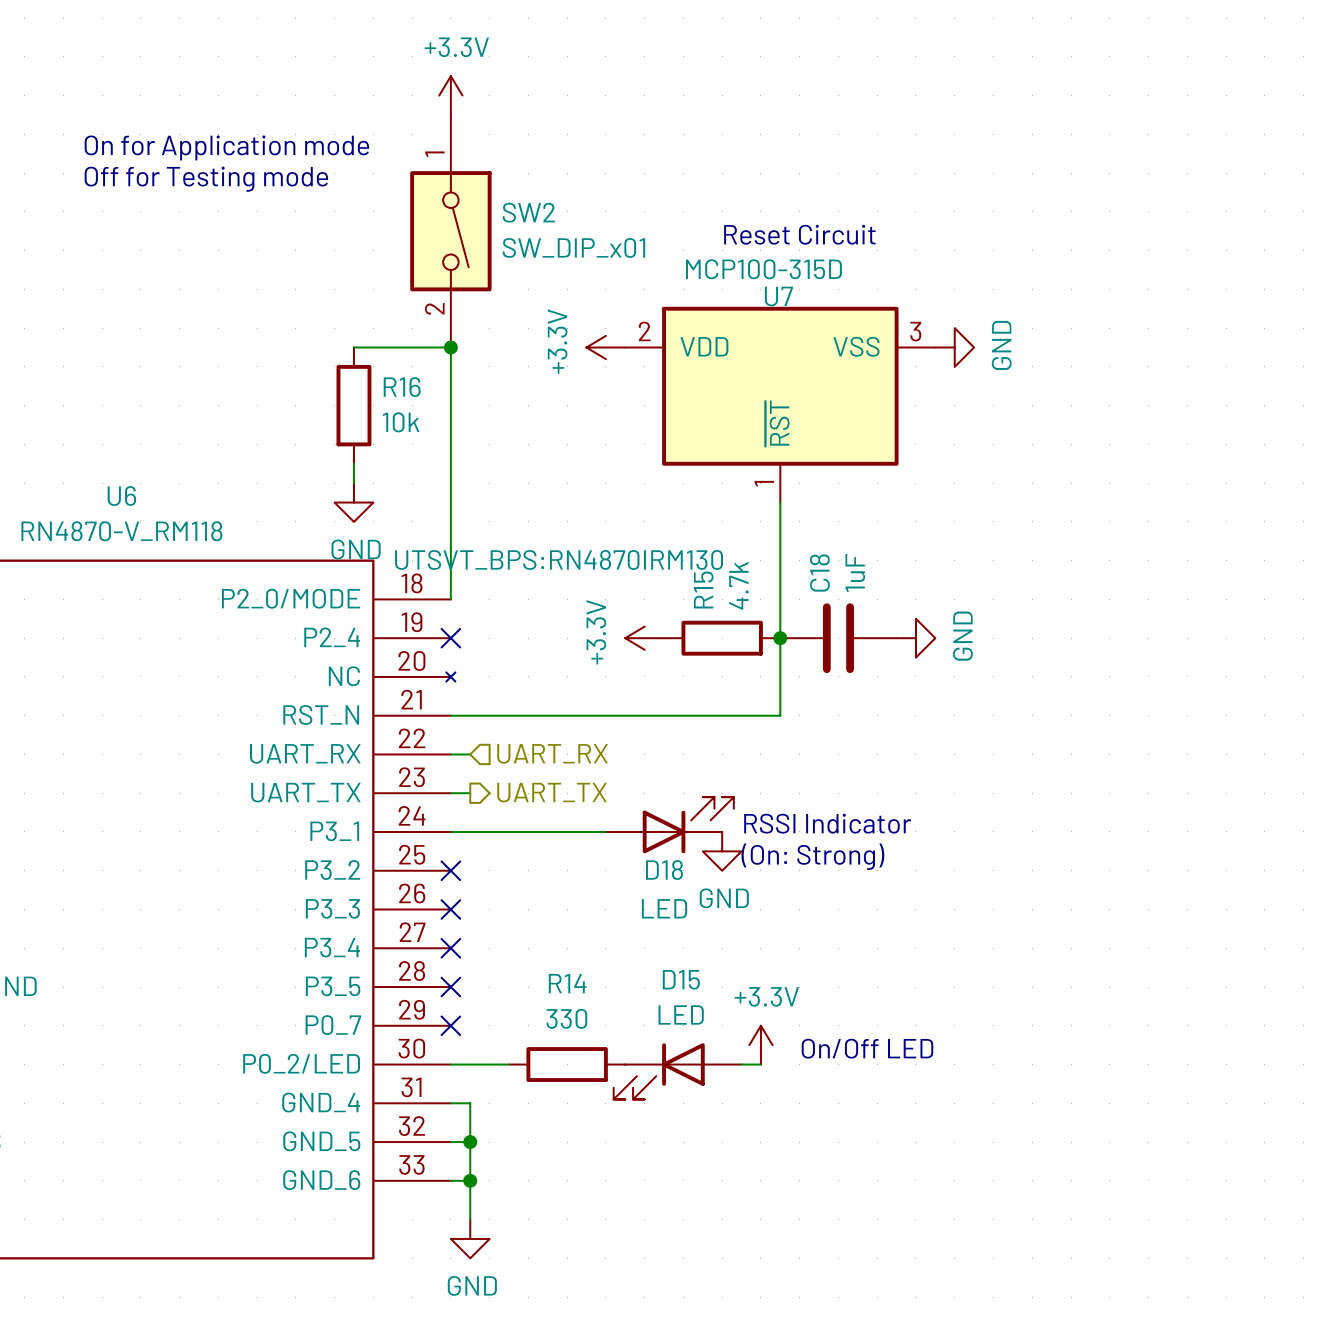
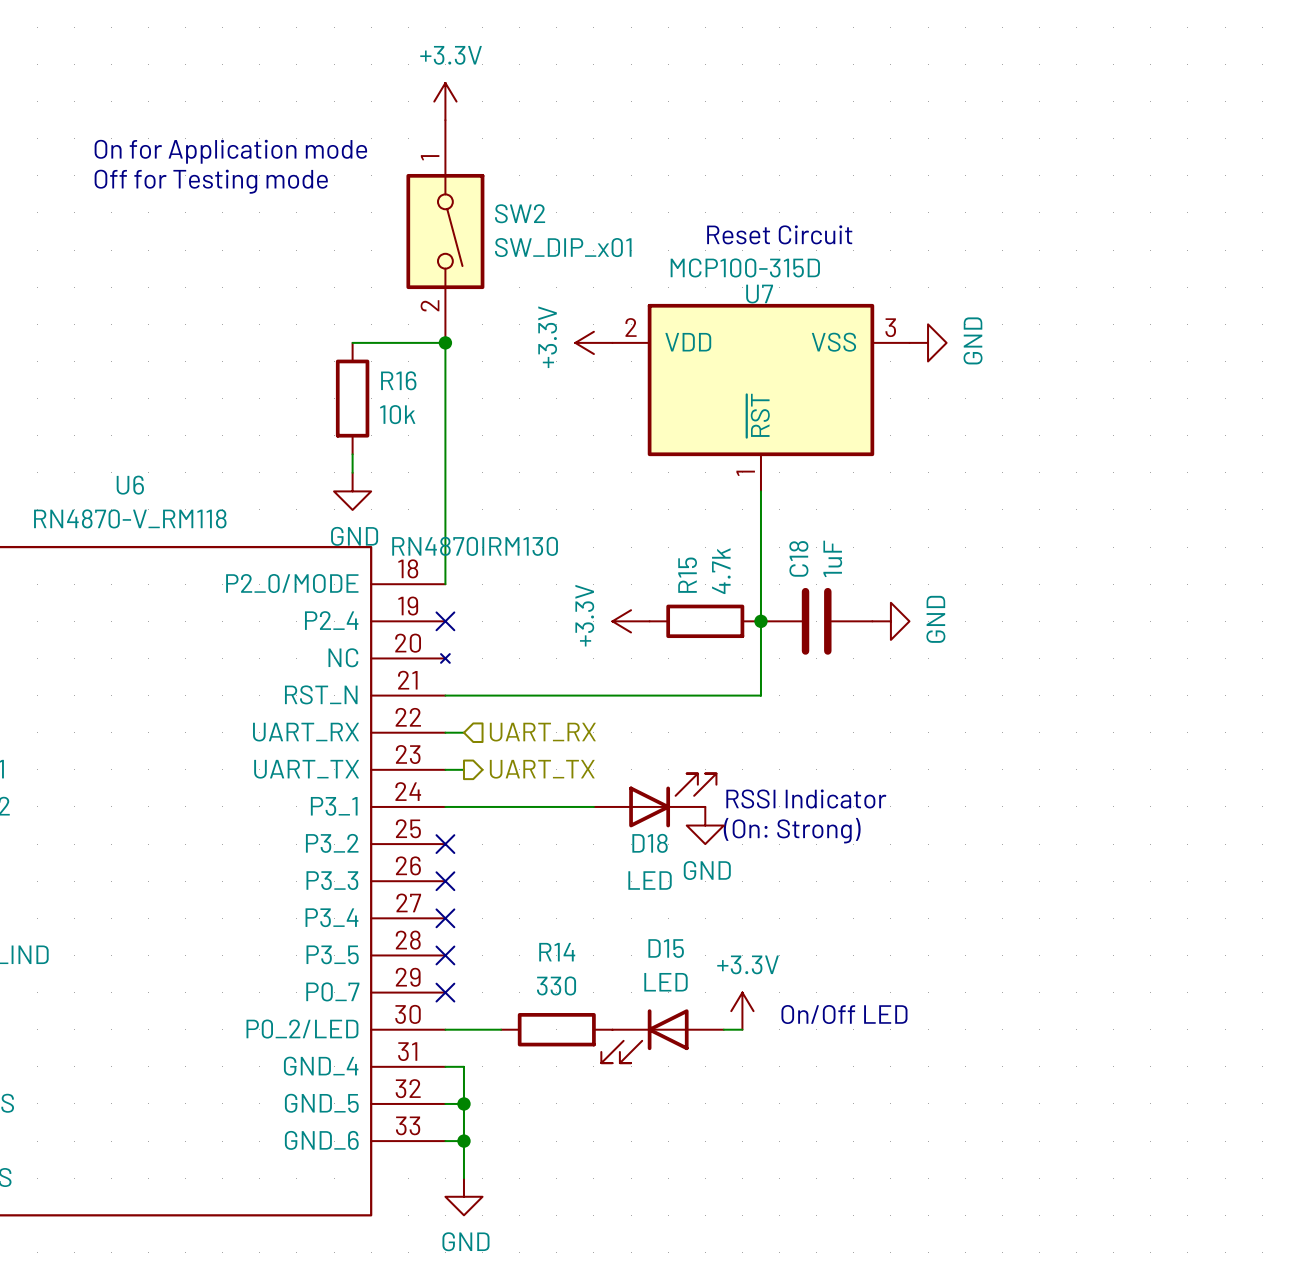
U6 text: UTSVT_BPS:RN4870IRM130 (559, 559) -> RN4870IRM130 (475, 546)

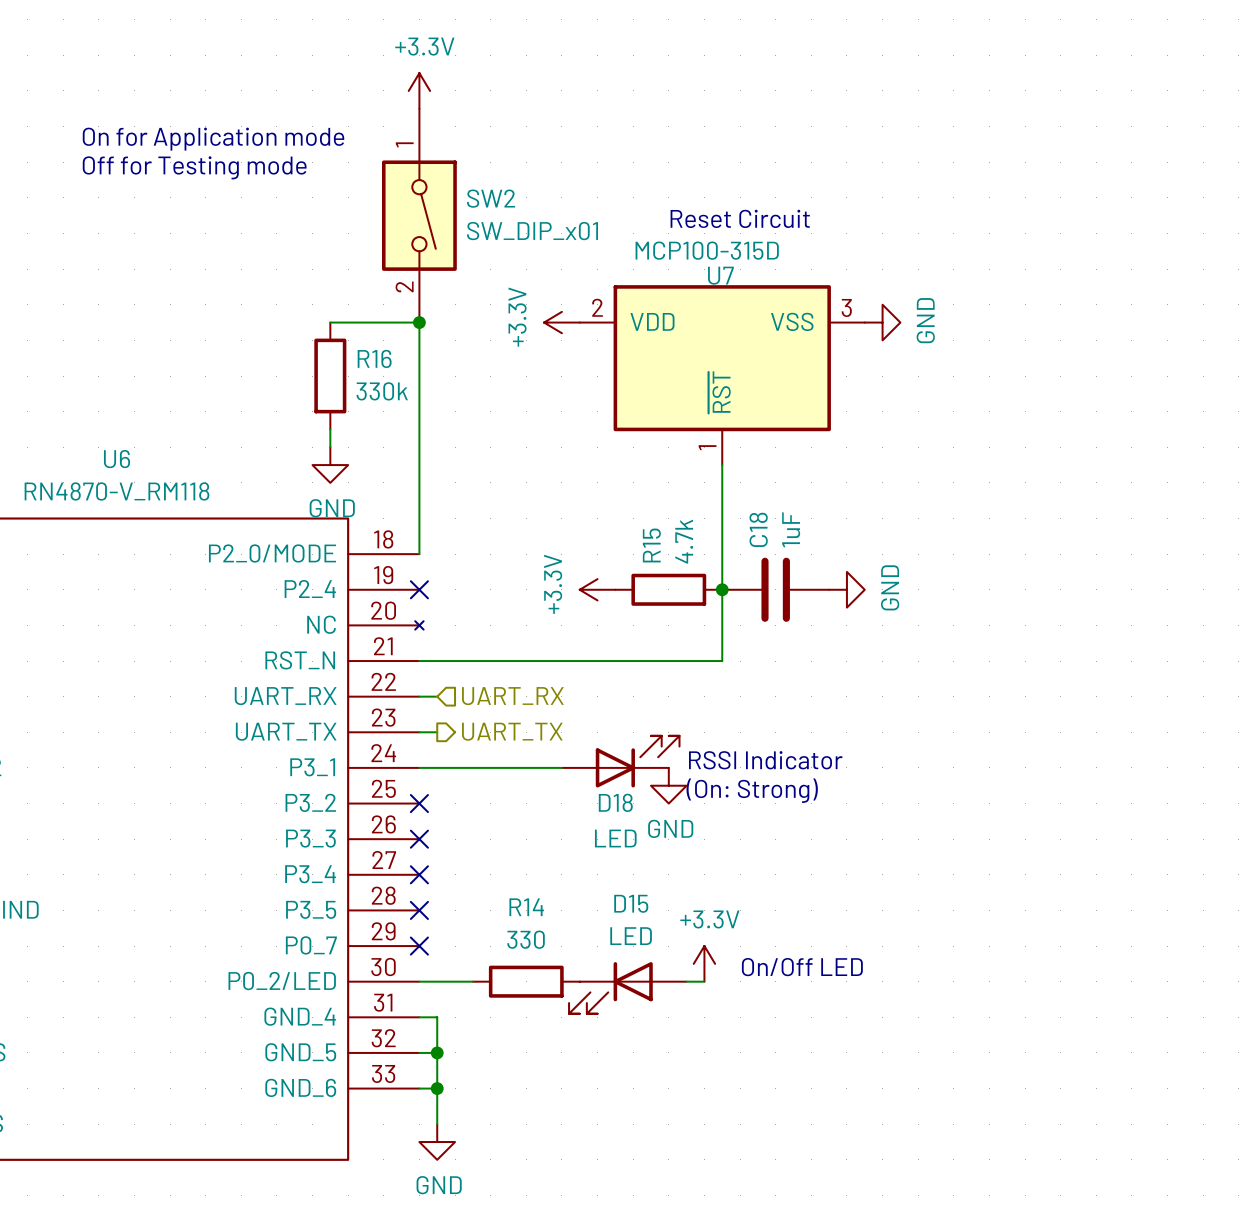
R16 value: 10k (397, 414) -> 330k (382, 391)
U6 text: RN4870IRM130 (475, 546) -> none

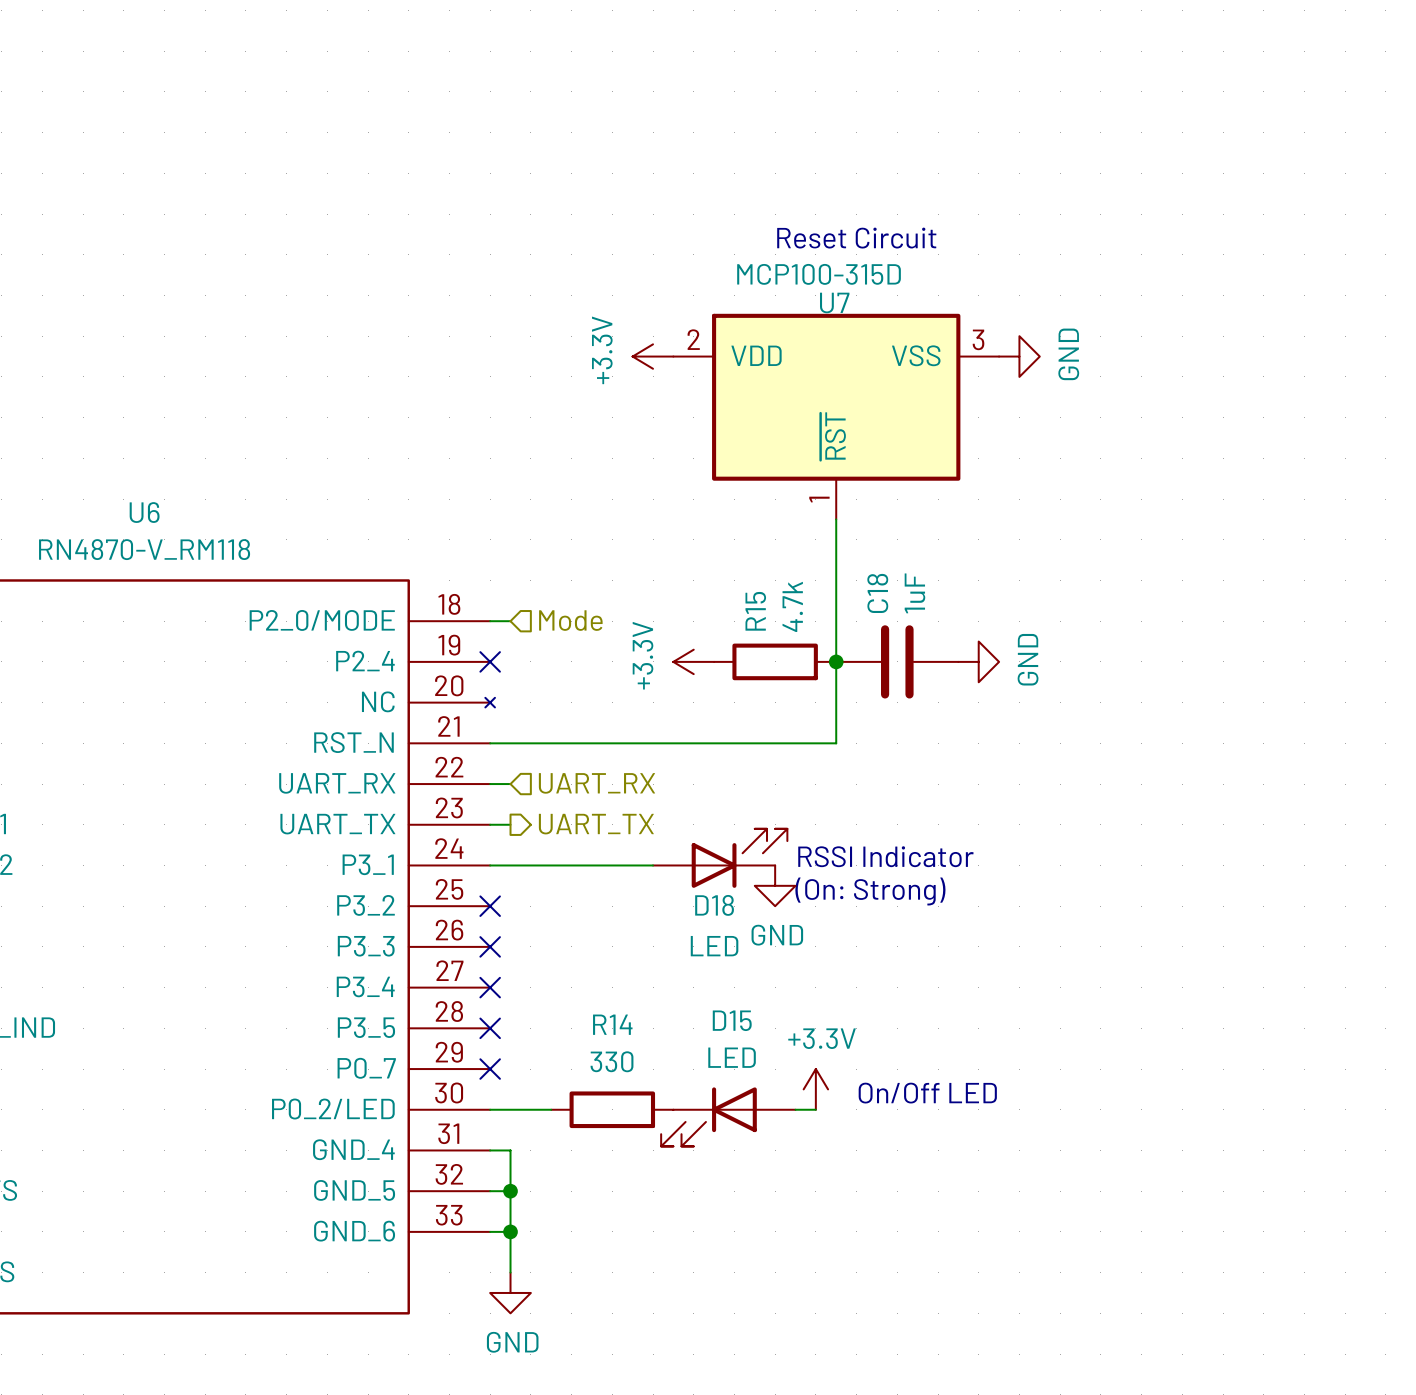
power symbol: +3.3V (419, 90) -> none
text: On for Application mode (213, 139) -> none
text: Off for Testing mode (194, 167) -> none
SW2: SW_DIP_x01 (419, 215) -> none
wire: (330, 322) (419, 322) (419, 554) -> (510, 621) (490, 621)
junction: (419, 322) -> none
R16: 330k (330, 376) -> none
wire: (330, 429) (330, 447) -> none
power symbol: GND (330, 465) -> none
hierarchical label: none -> Mode (570, 620)

